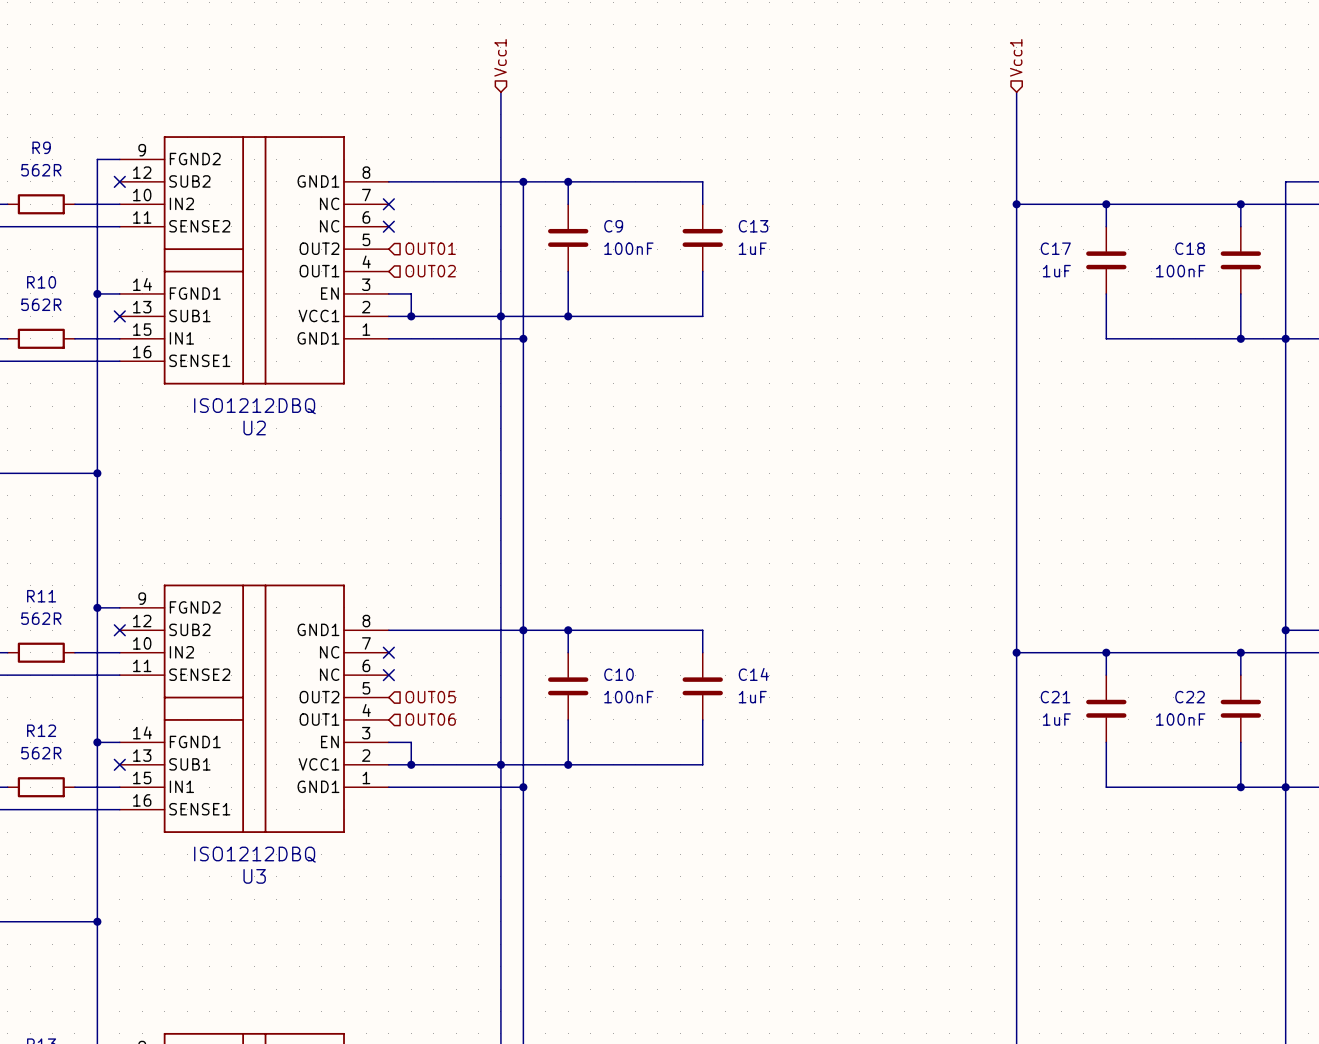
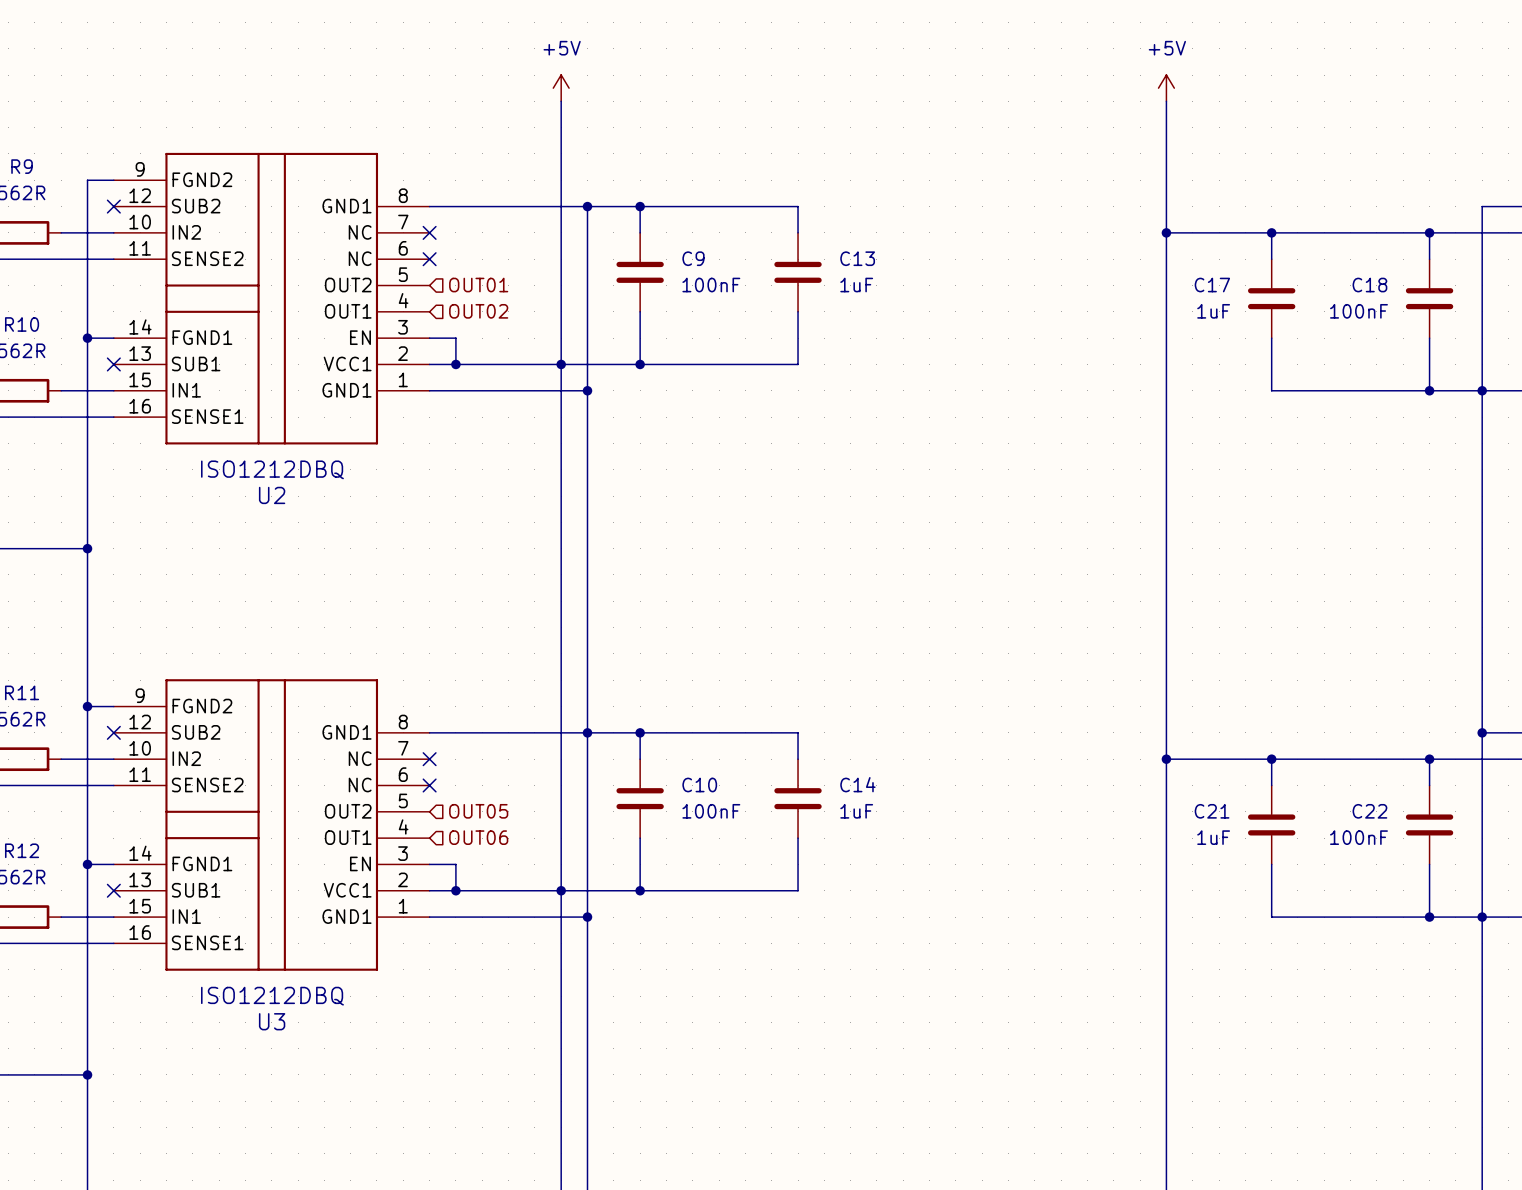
hierarchical label: Vcc1 (500, 57) -> none
hierarchical label: Vcc1 (1016, 57) -> none
power symbol: none -> +5V (561, 88)
power symbol: none -> +5V (1166, 88)

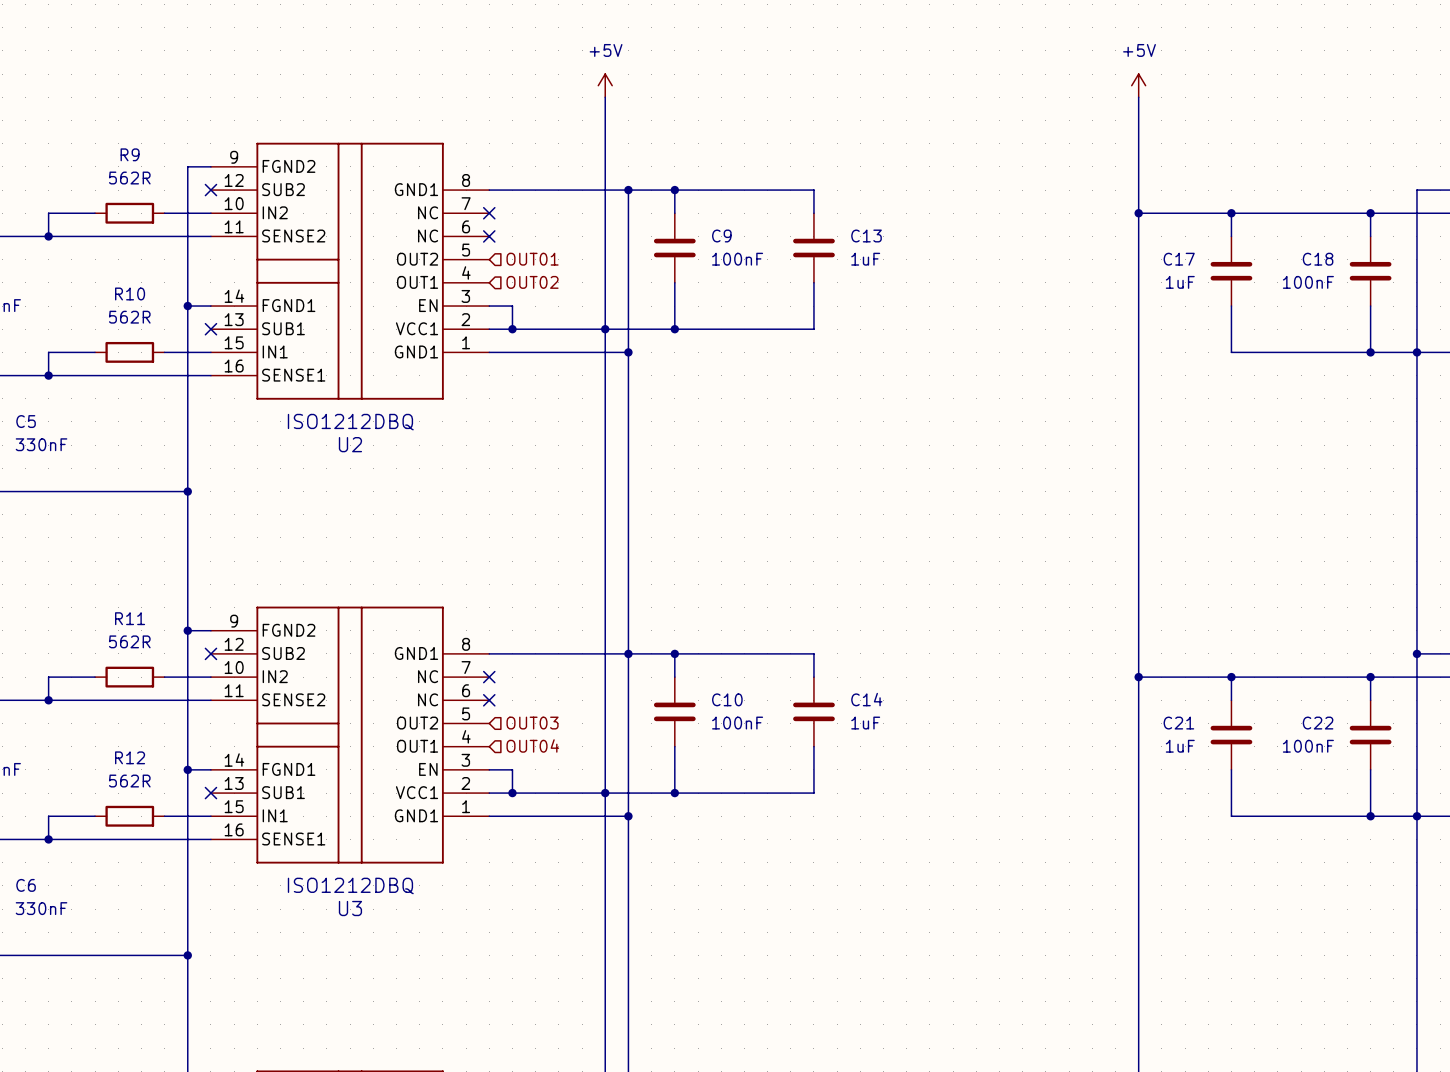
hierarchical label: OUT05 (478, 811) -> OUT03 (532, 723)
hierarchical label: OUT06 (478, 837) -> OUT04 (532, 745)

